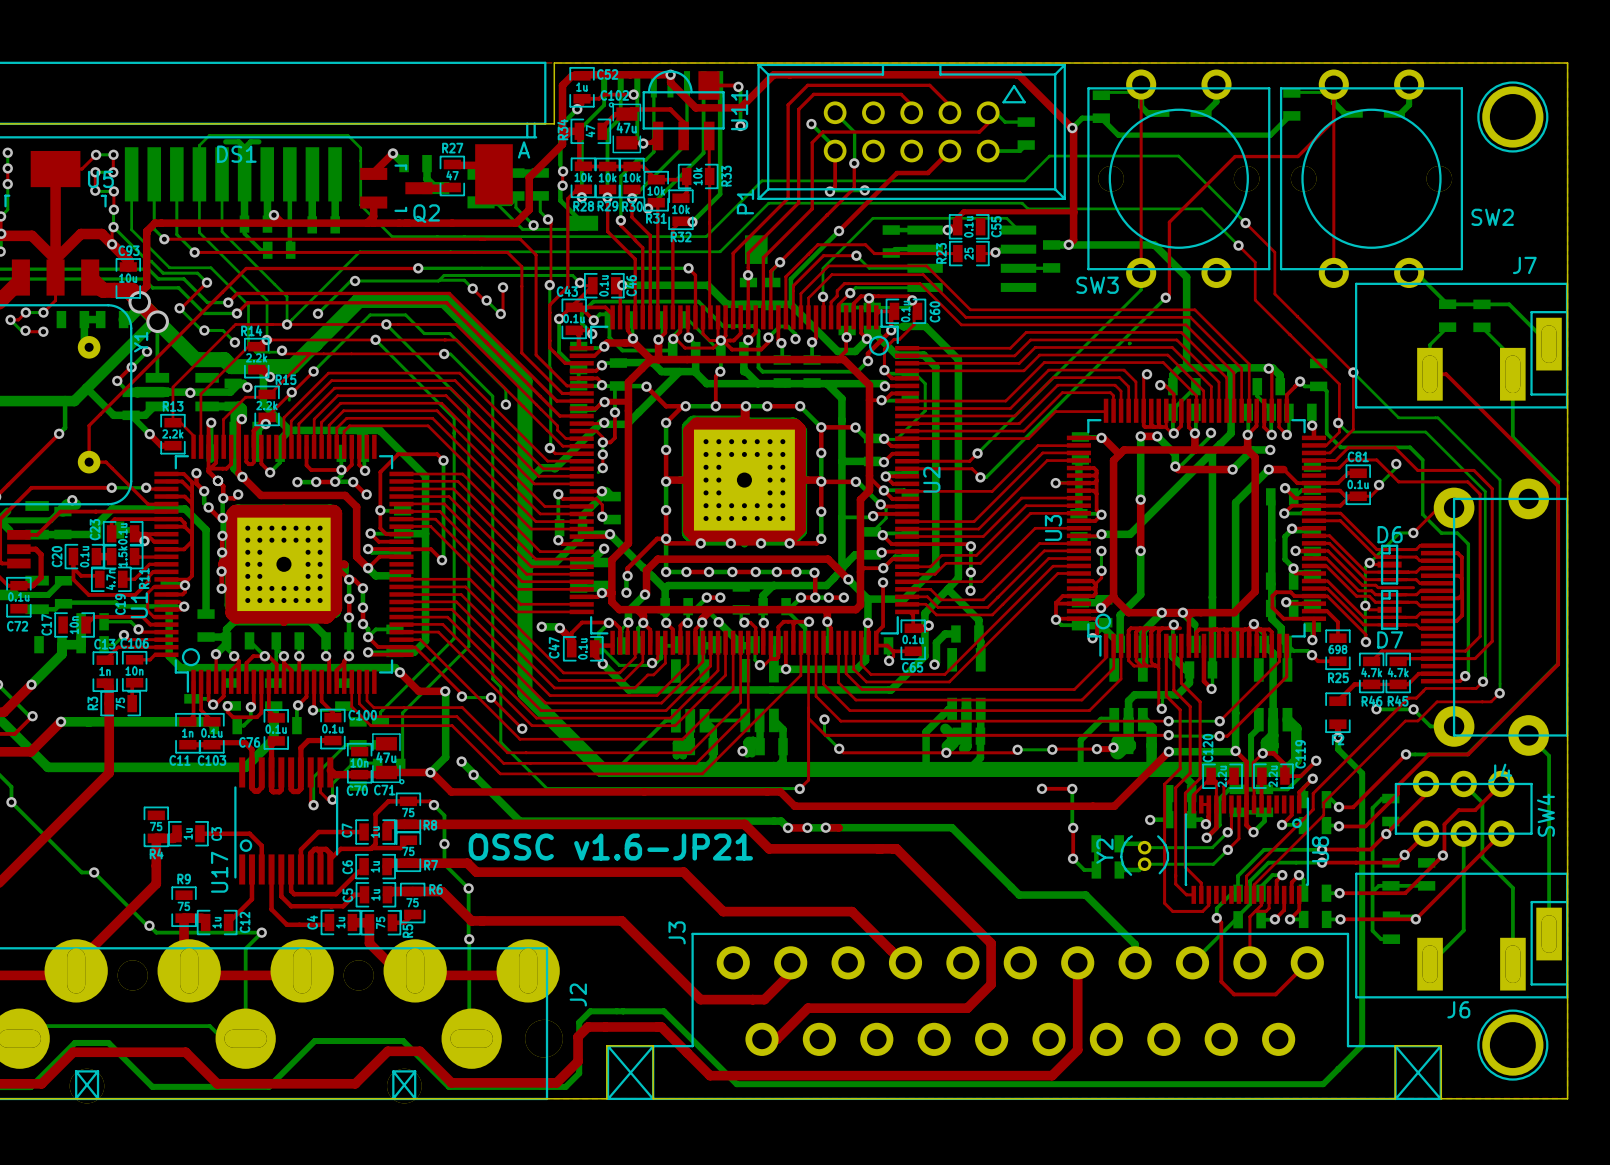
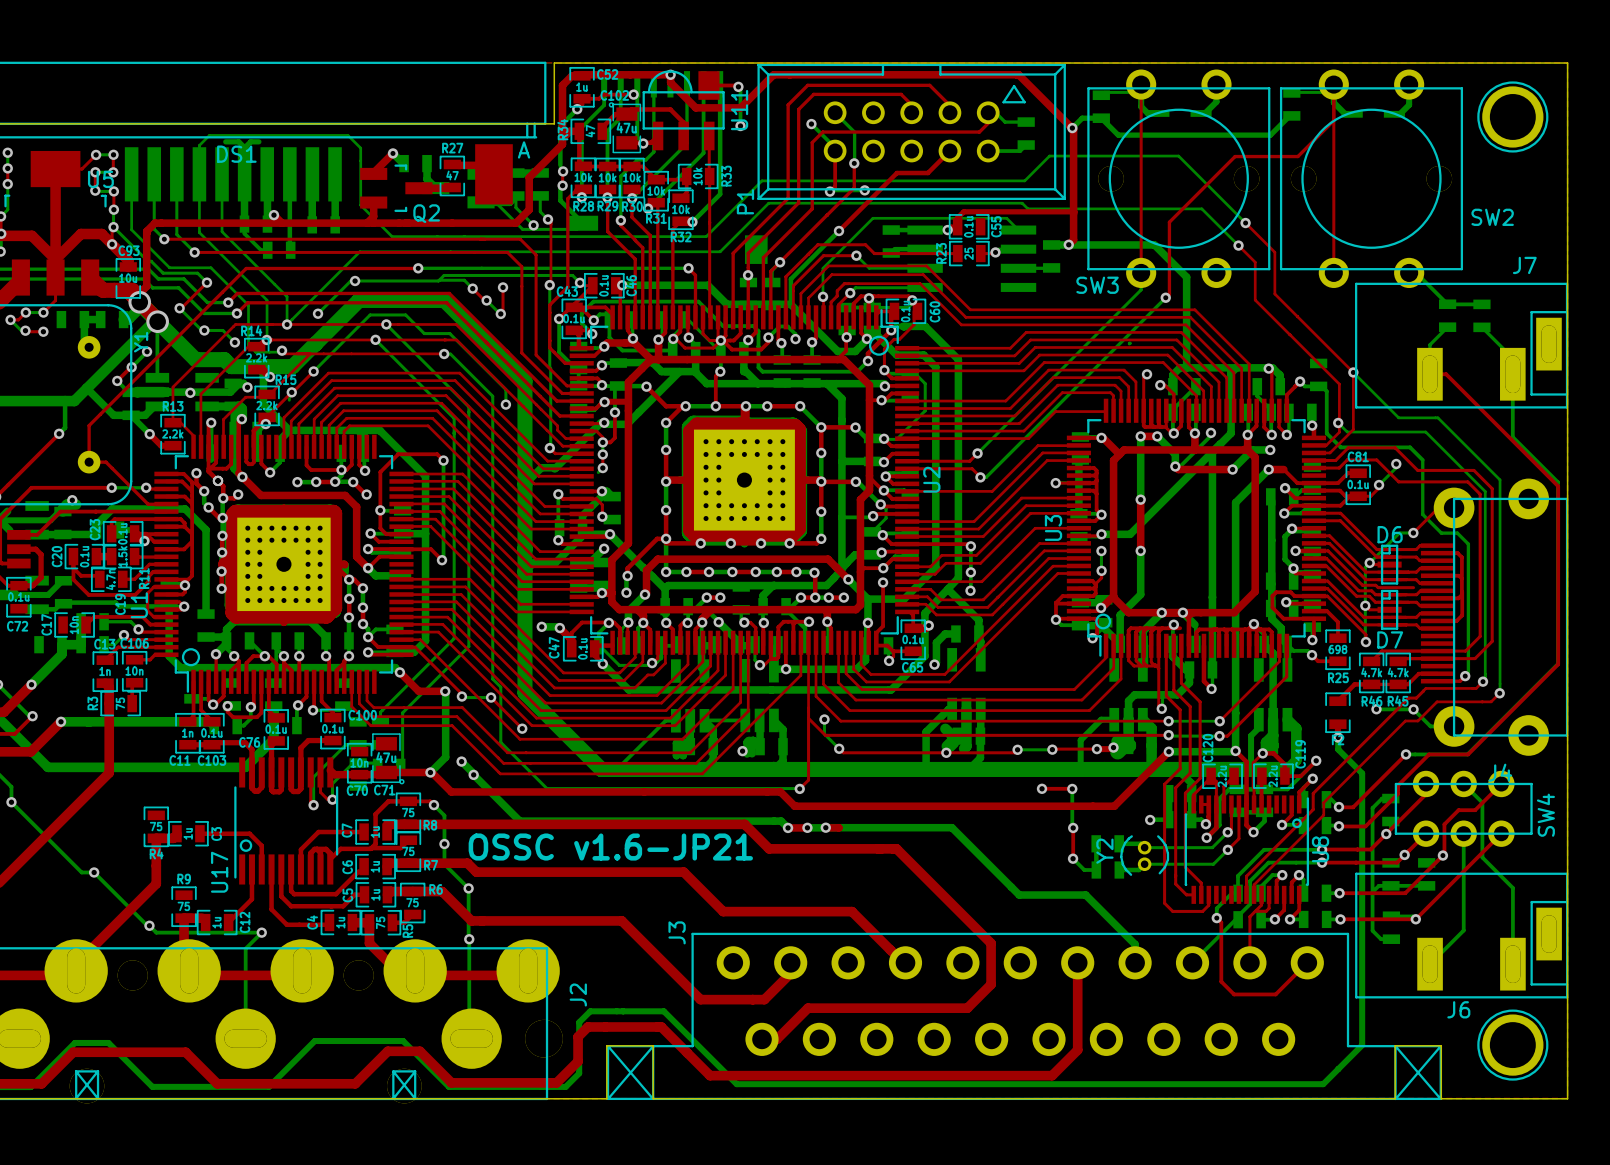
bottom track: (1481, 304) (1509, 304) (1548, 344) -> none
bottom track: (1528, 735) (1549, 755) (1549, 934) -> none
bottom track: (19, 1038) (32, 1026) (209, 1026) (222, 1038) (245, 1038) -> none

